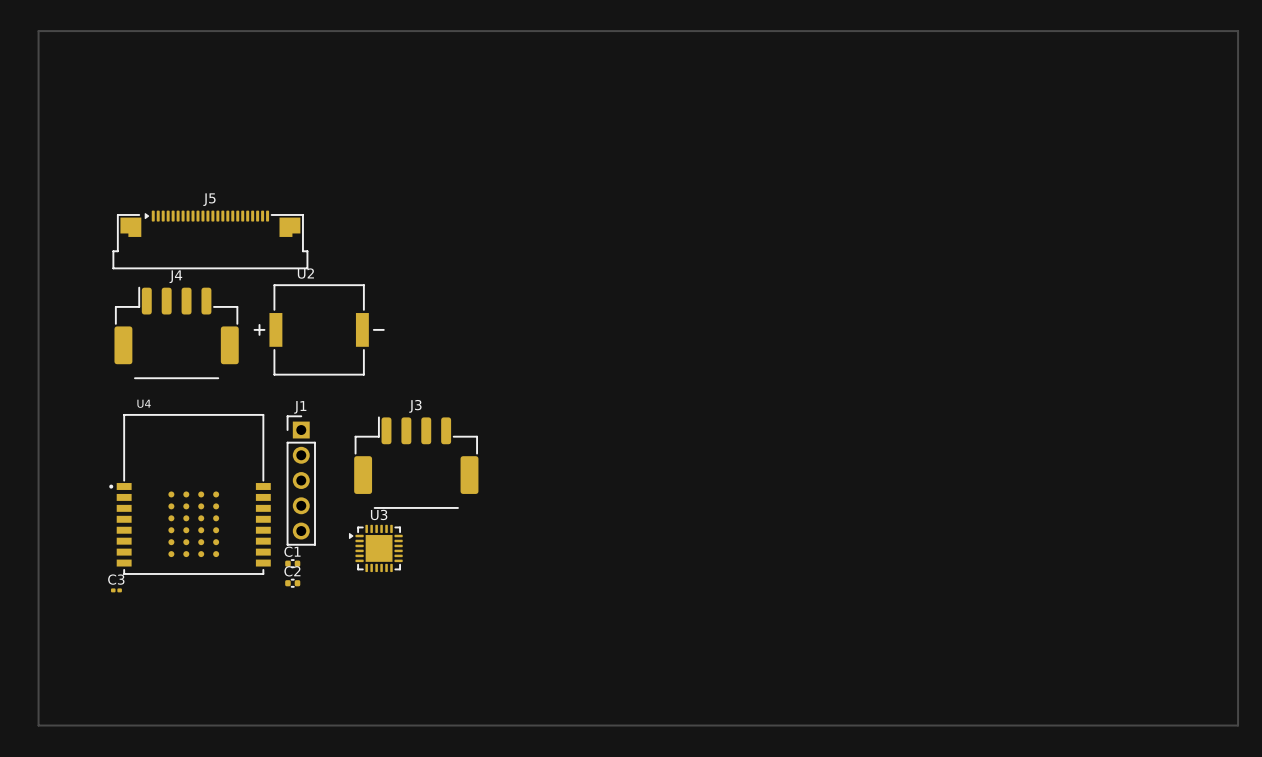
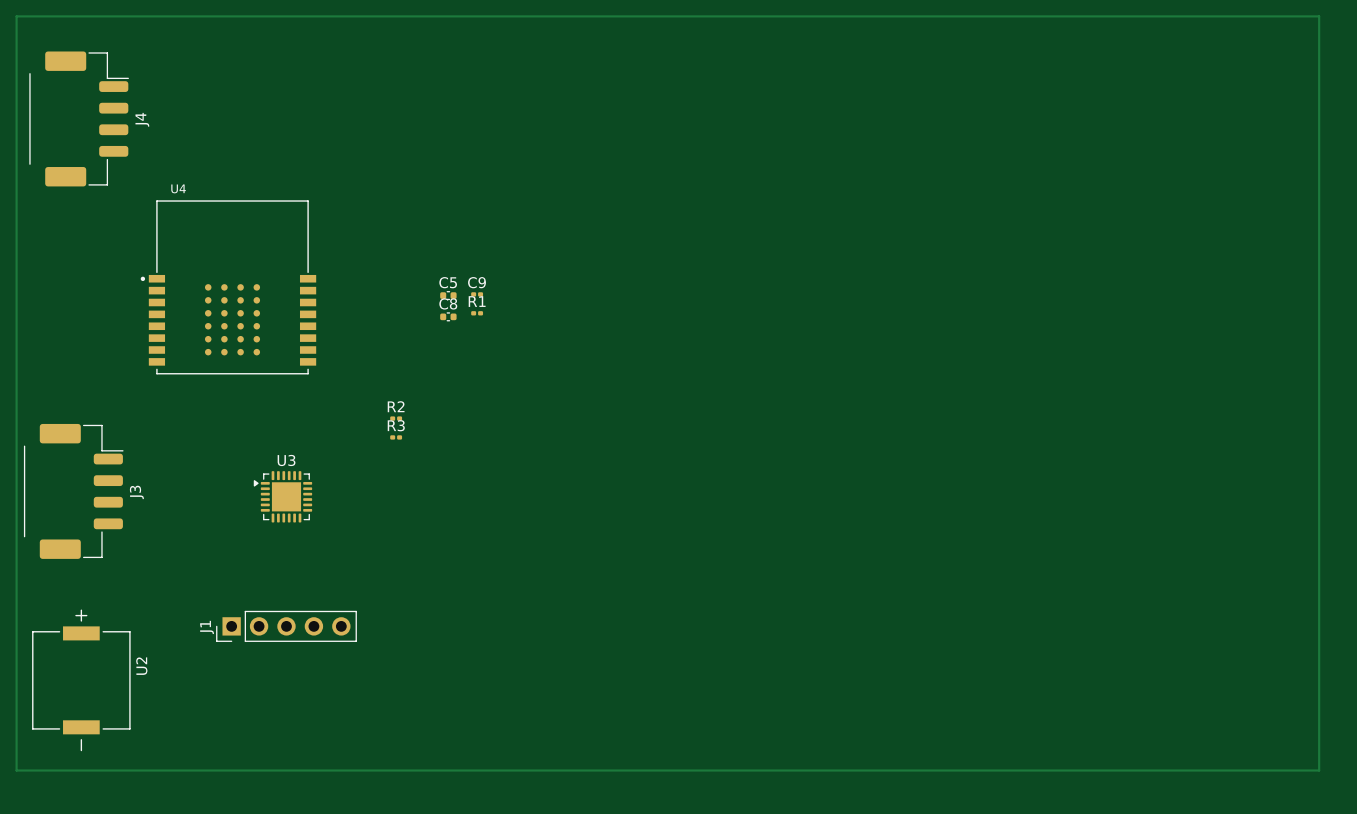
J5: (210, 239) -> none
C9: none -> (477, 294)
C5: none -> (448, 295)
R1: none -> (477, 313)
C8: none -> (448, 316)
U2 rotation: 0° (319, 329) -> 90° clockwise (81, 680)
U2 position: (319, 329) -> (81, 680)
J4 rotation: 0° (176, 332) -> 90° clockwise (79, 118)
J4 position: (176, 332) -> (79, 118)
R2: none -> (396, 418)
R3: none -> (396, 437)
J3 rotation: 0° (416, 462) -> 90° clockwise (73, 491)
J3 position: (416, 462) -> (73, 491)
J1 rotation: 0° (301, 480) -> 90° counterclockwise (286, 626)
J1 position: (301, 480) -> (286, 626)
U4 position: (190, 494) -> (228, 287)
U3 position: (375, 548) -> (282, 496)
C1: (292, 563) -> none
C2: (292, 583) -> none
C3: (116, 590) -> none

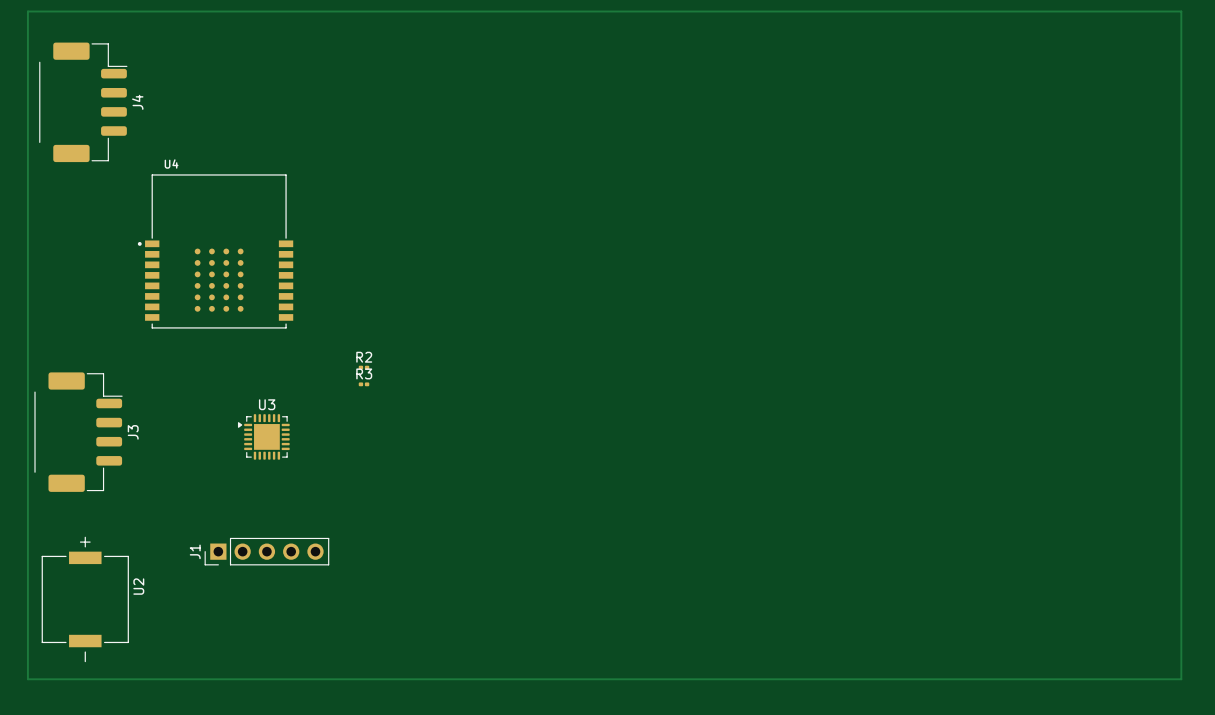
C9: (477, 294) -> none
C5: (448, 295) -> none
R1: (477, 313) -> none
C8: (448, 316) -> none

